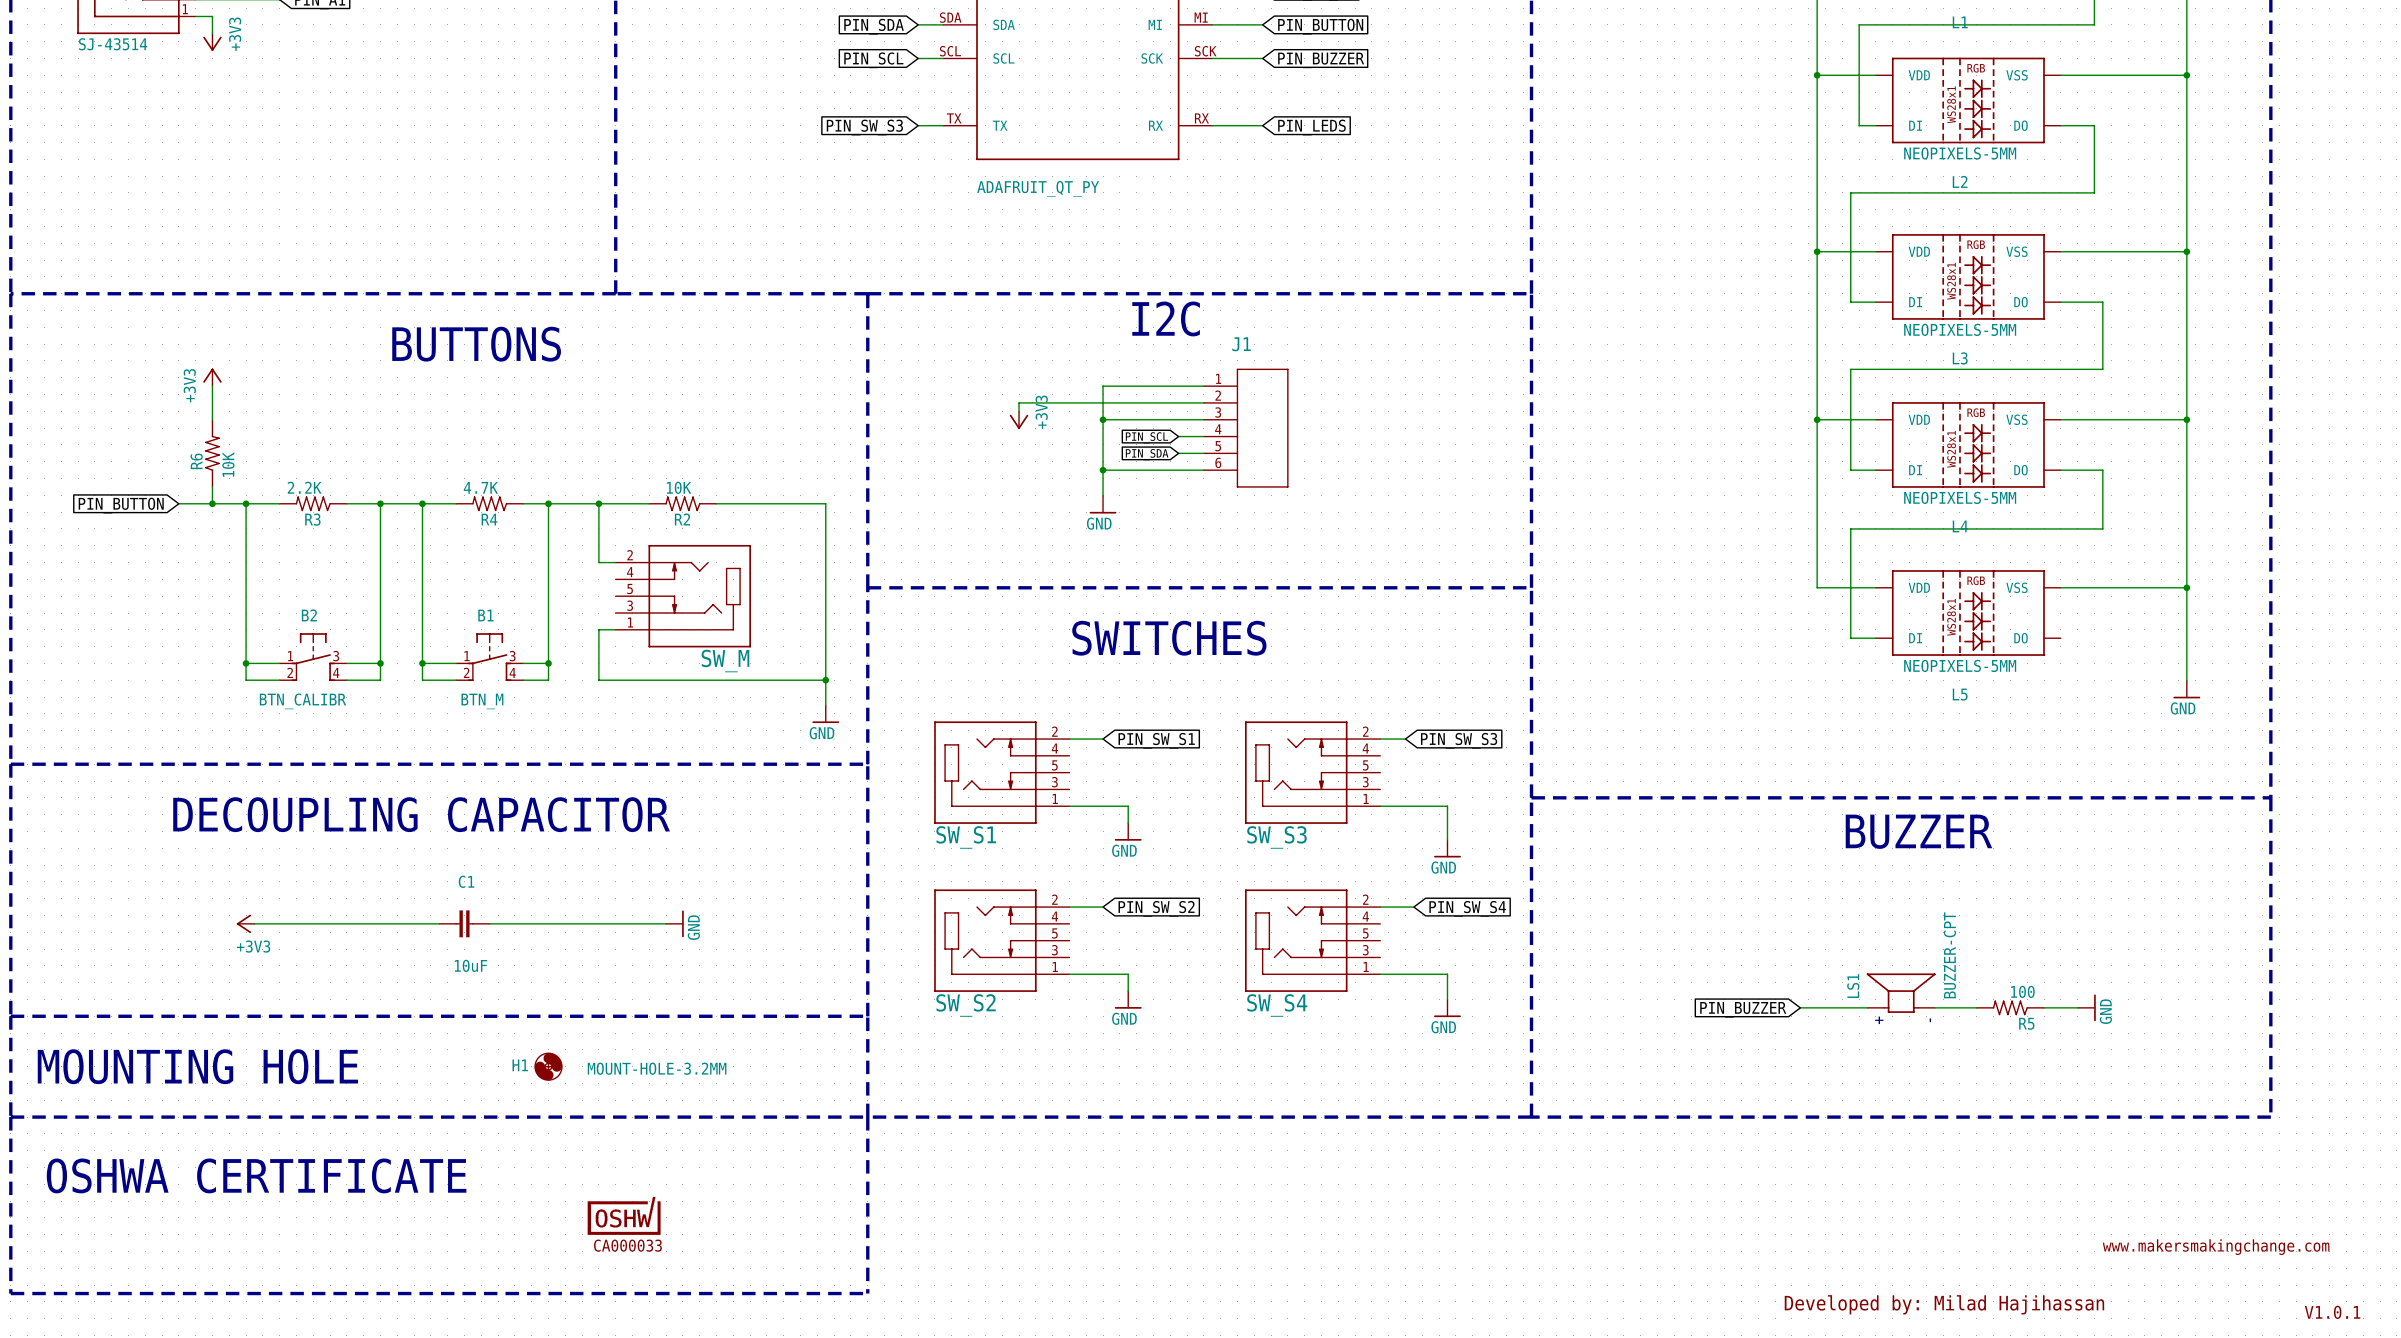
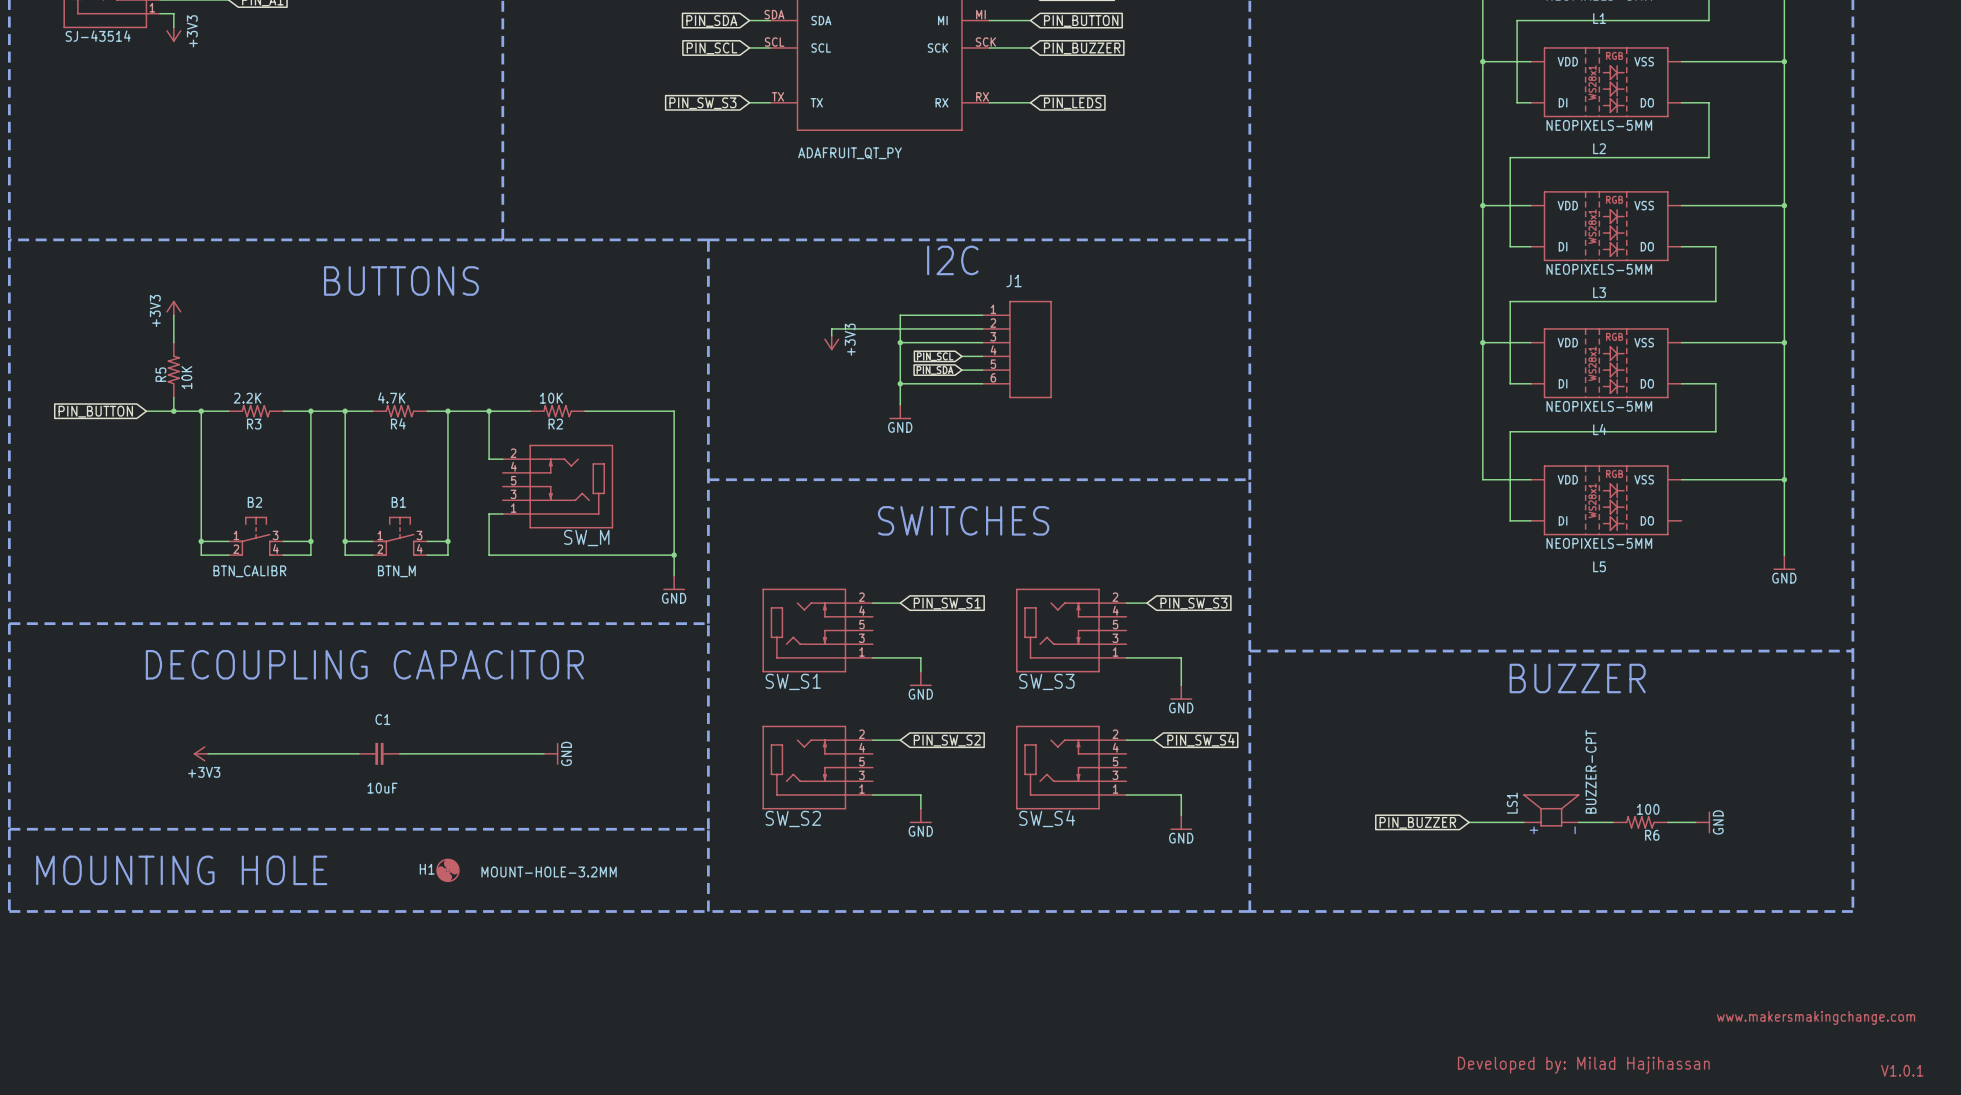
R6 name: R6 (196, 461) -> R5 (160, 374)
R5 name: R5 (2026, 1023) -> R6 (1652, 835)
line: (10, 1117) (10, 1293) (867, 1293) (867, 1117) -> none
text: OSHWA CERTIFICATE (256, 1175) -> none
part: CA000033 (624, 1215) -> none

